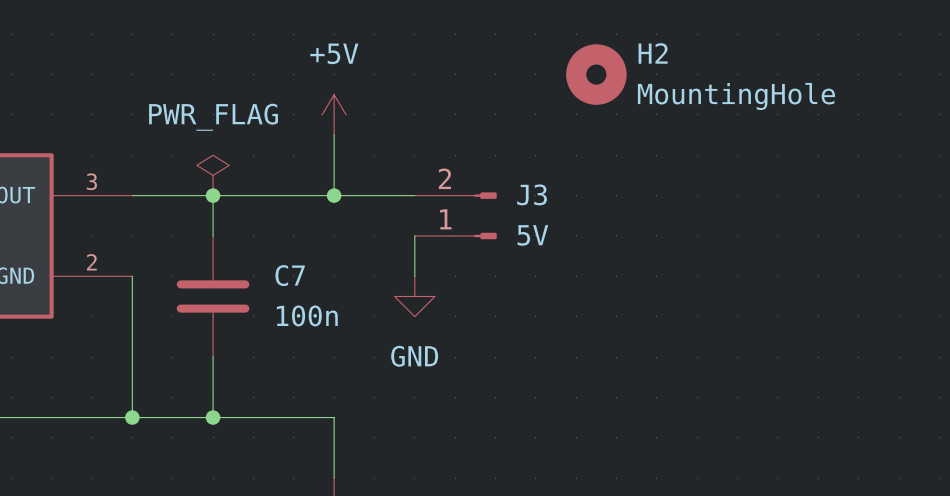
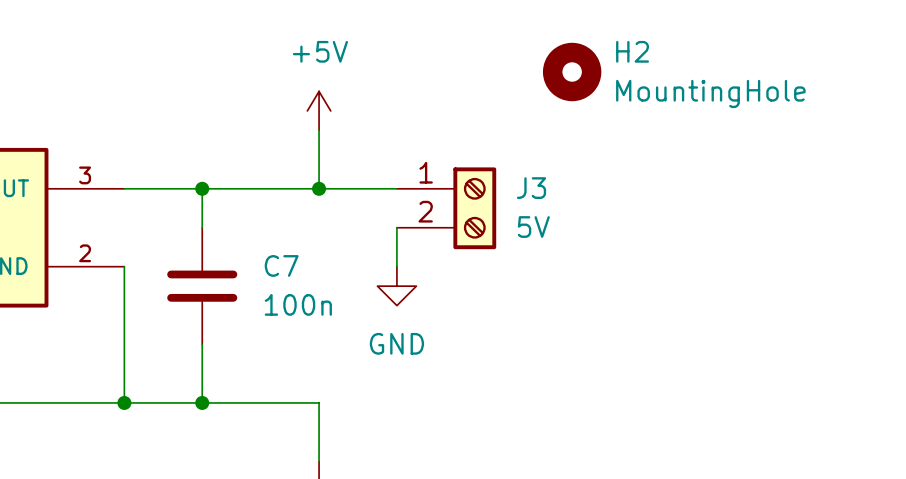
power symbol: PWR_FLAG (213, 175) -> none
J3 symbol: [414, 192, 497, 240] -> [396, 167, 497, 250]

